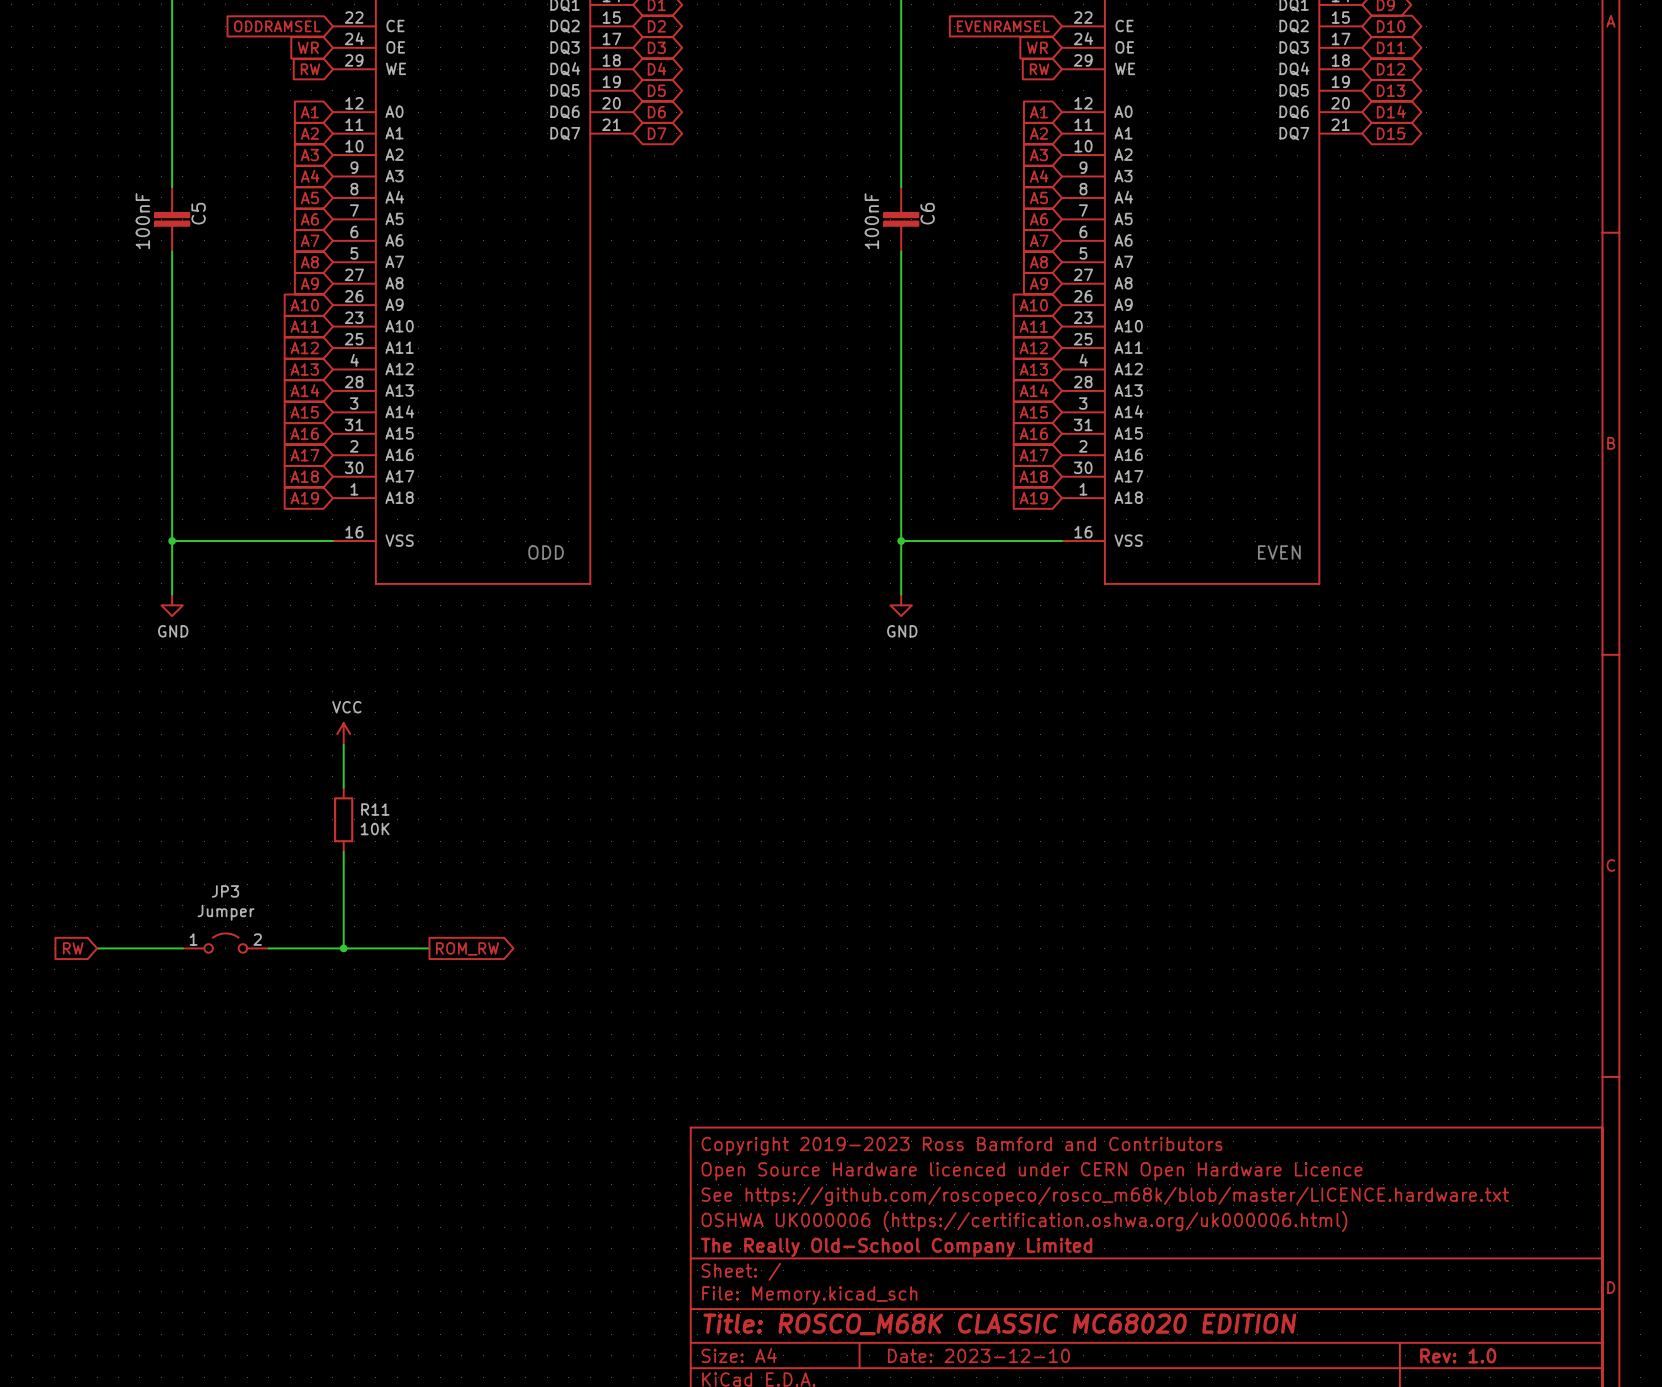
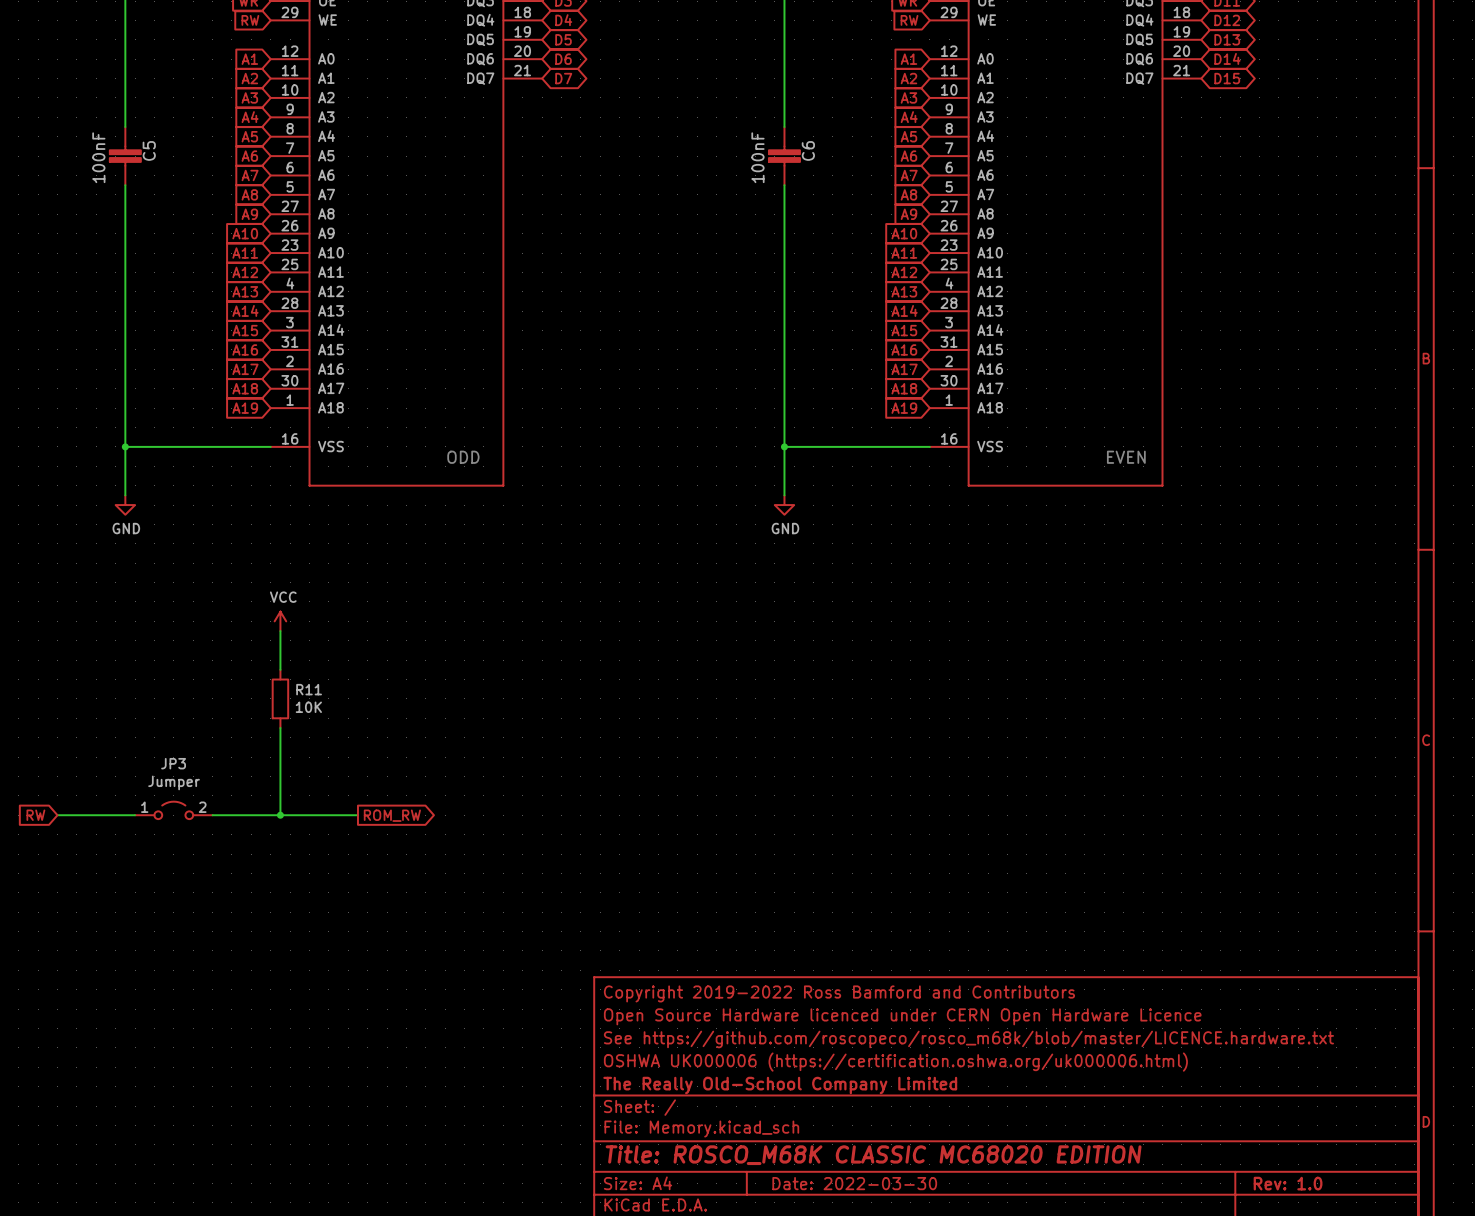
title block: Copyright 2019-2023 Ross Bamford and Contributors (962, 1146) -> Copyright 2019-2022 Ross Bamford and Contributors (839, 993)
title block: Date: 2023-12-10 (978, 1355) -> Date: 2022-03-30 (854, 1183)

